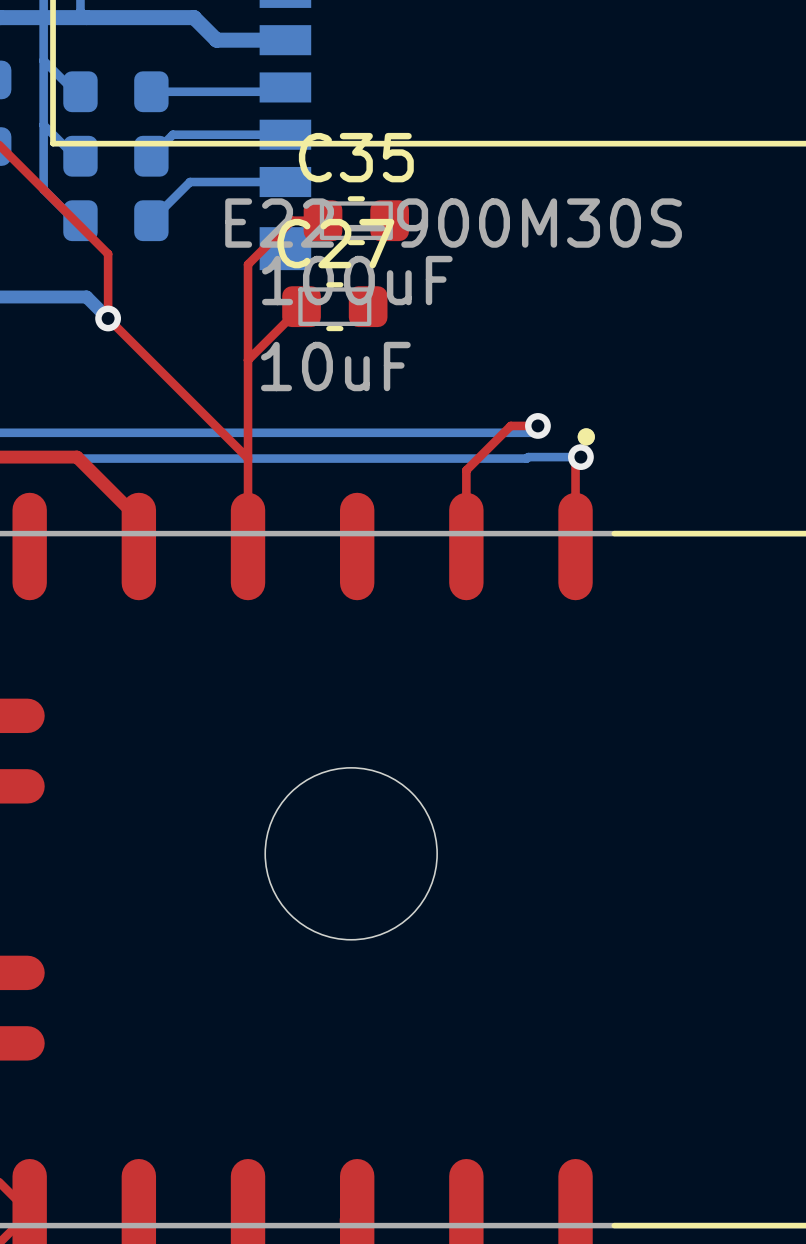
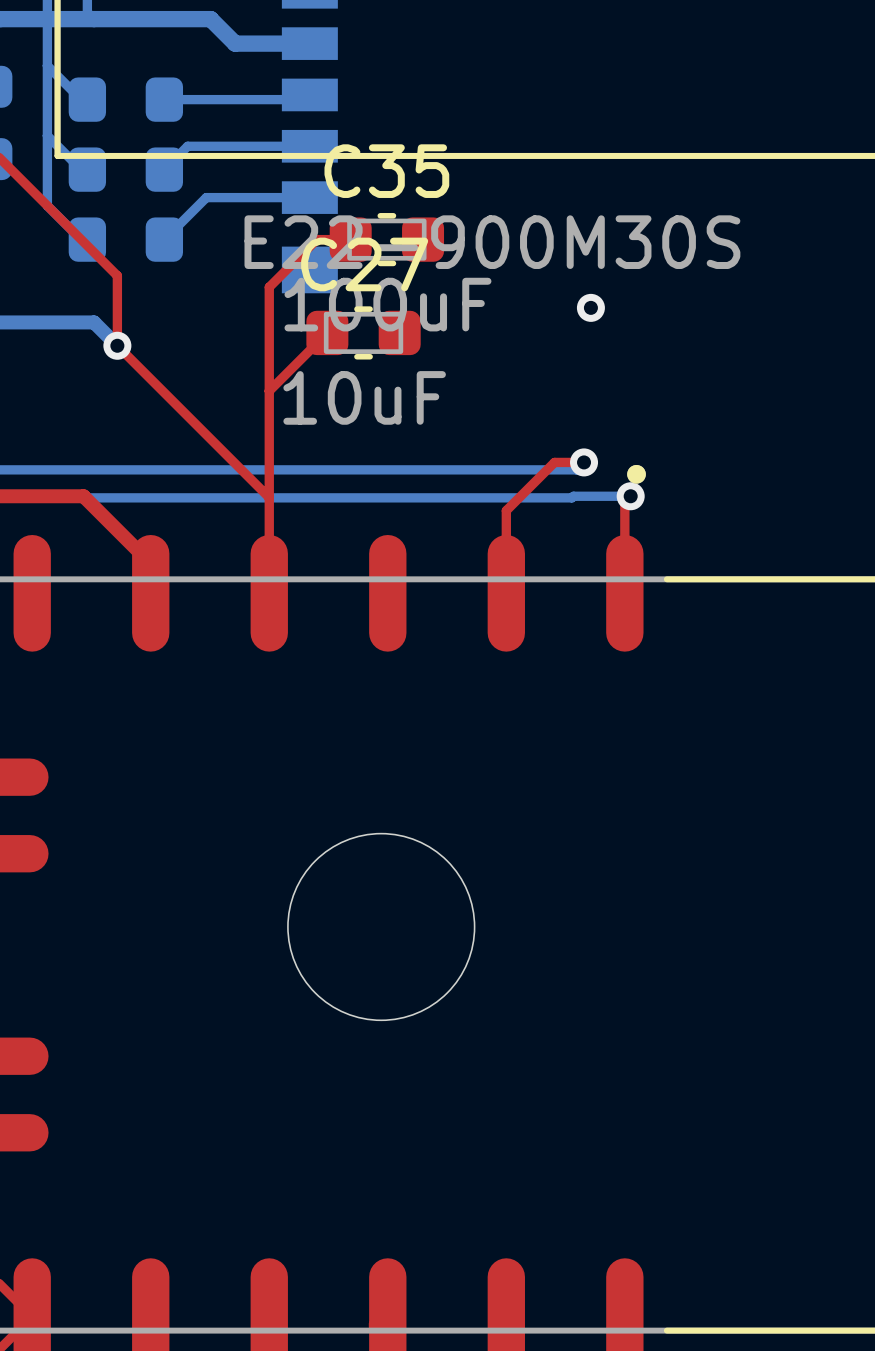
via: none -> (590, 307)

